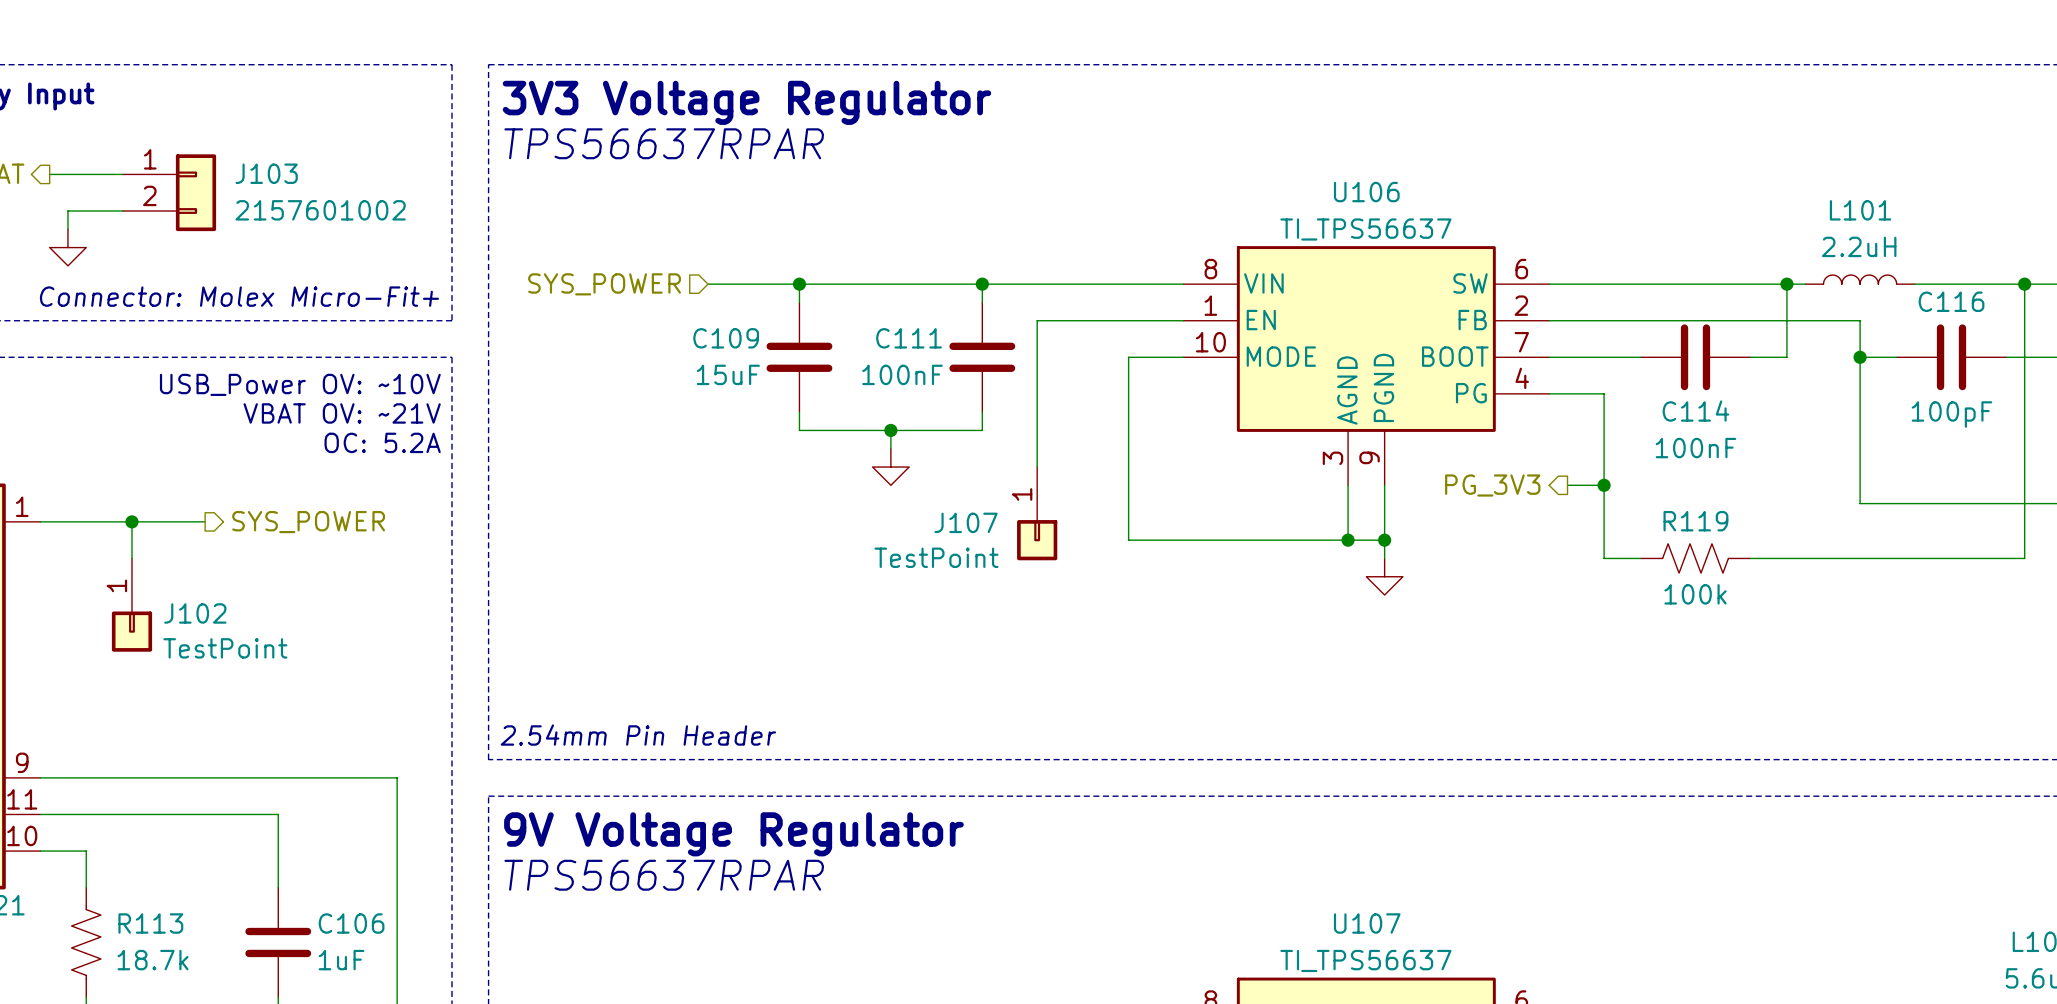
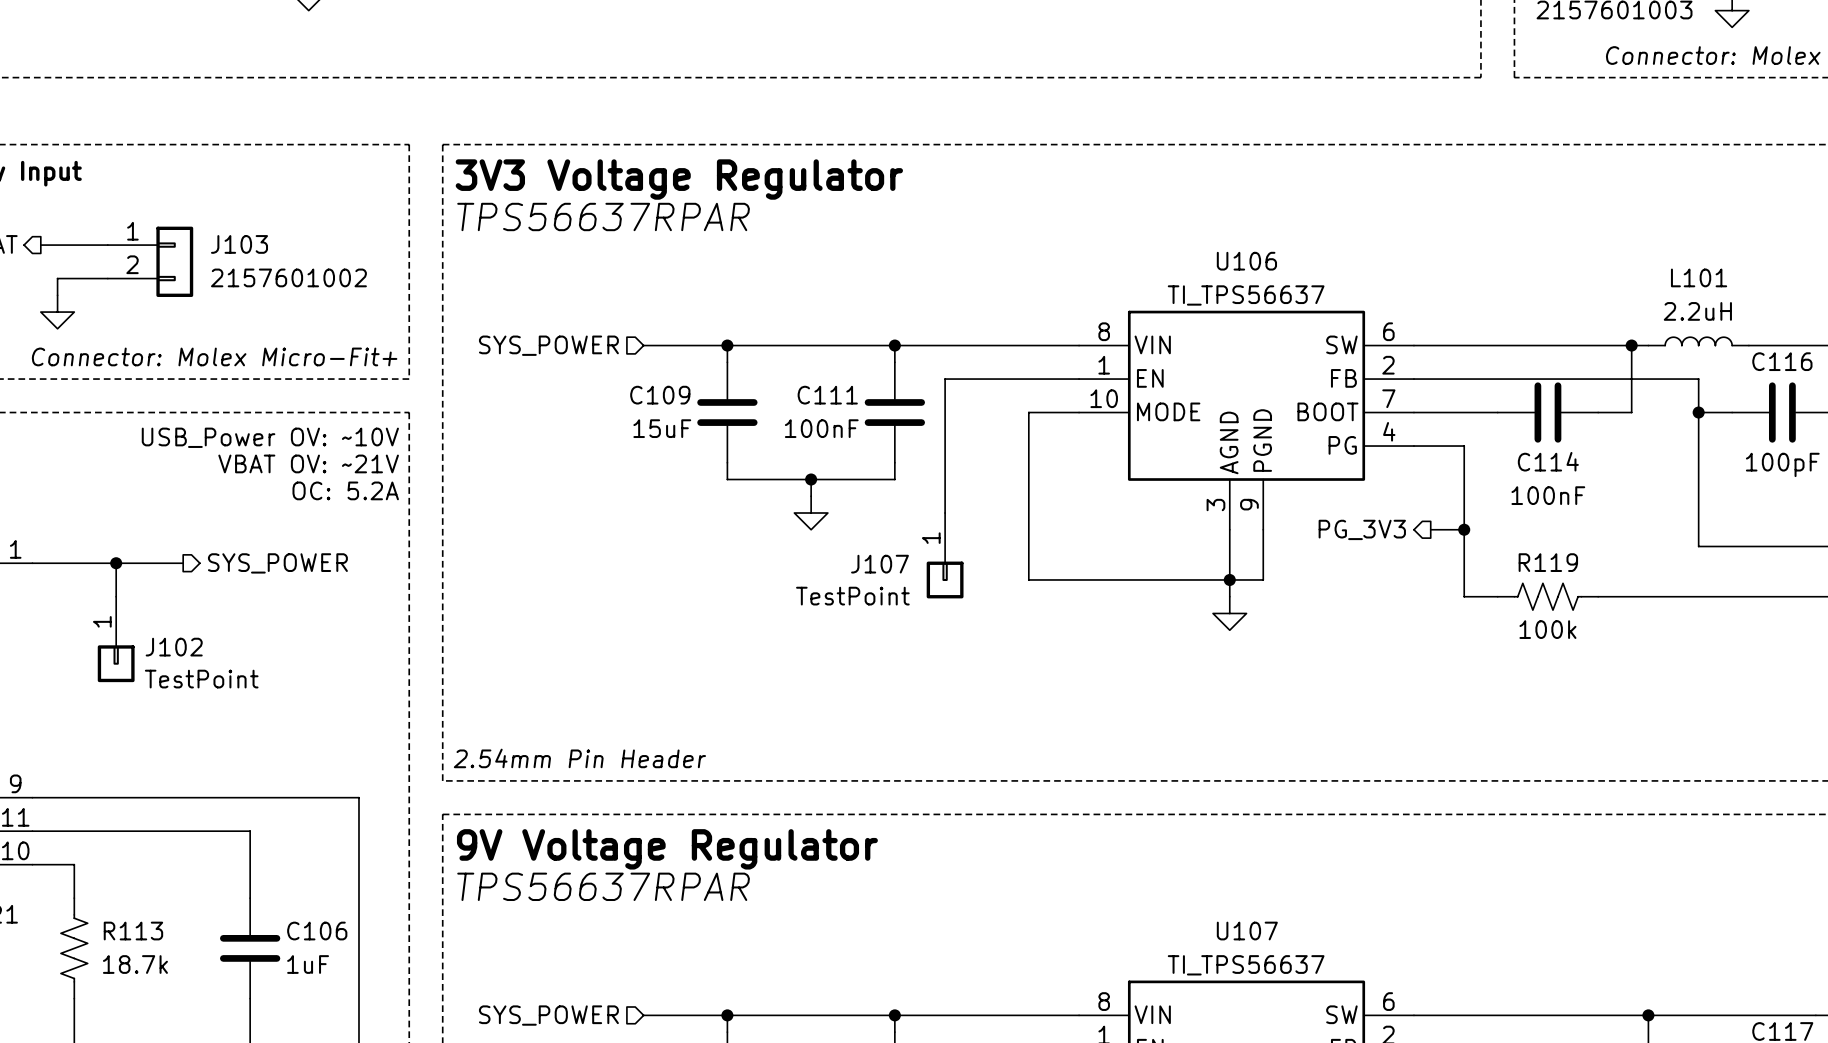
wire: (1384, 540) (1384, 558) -> (1229, 579) (1229, 596)
junction: (1384, 540) -> none
power symbol position: (1384, 576) -> (1229, 613)

